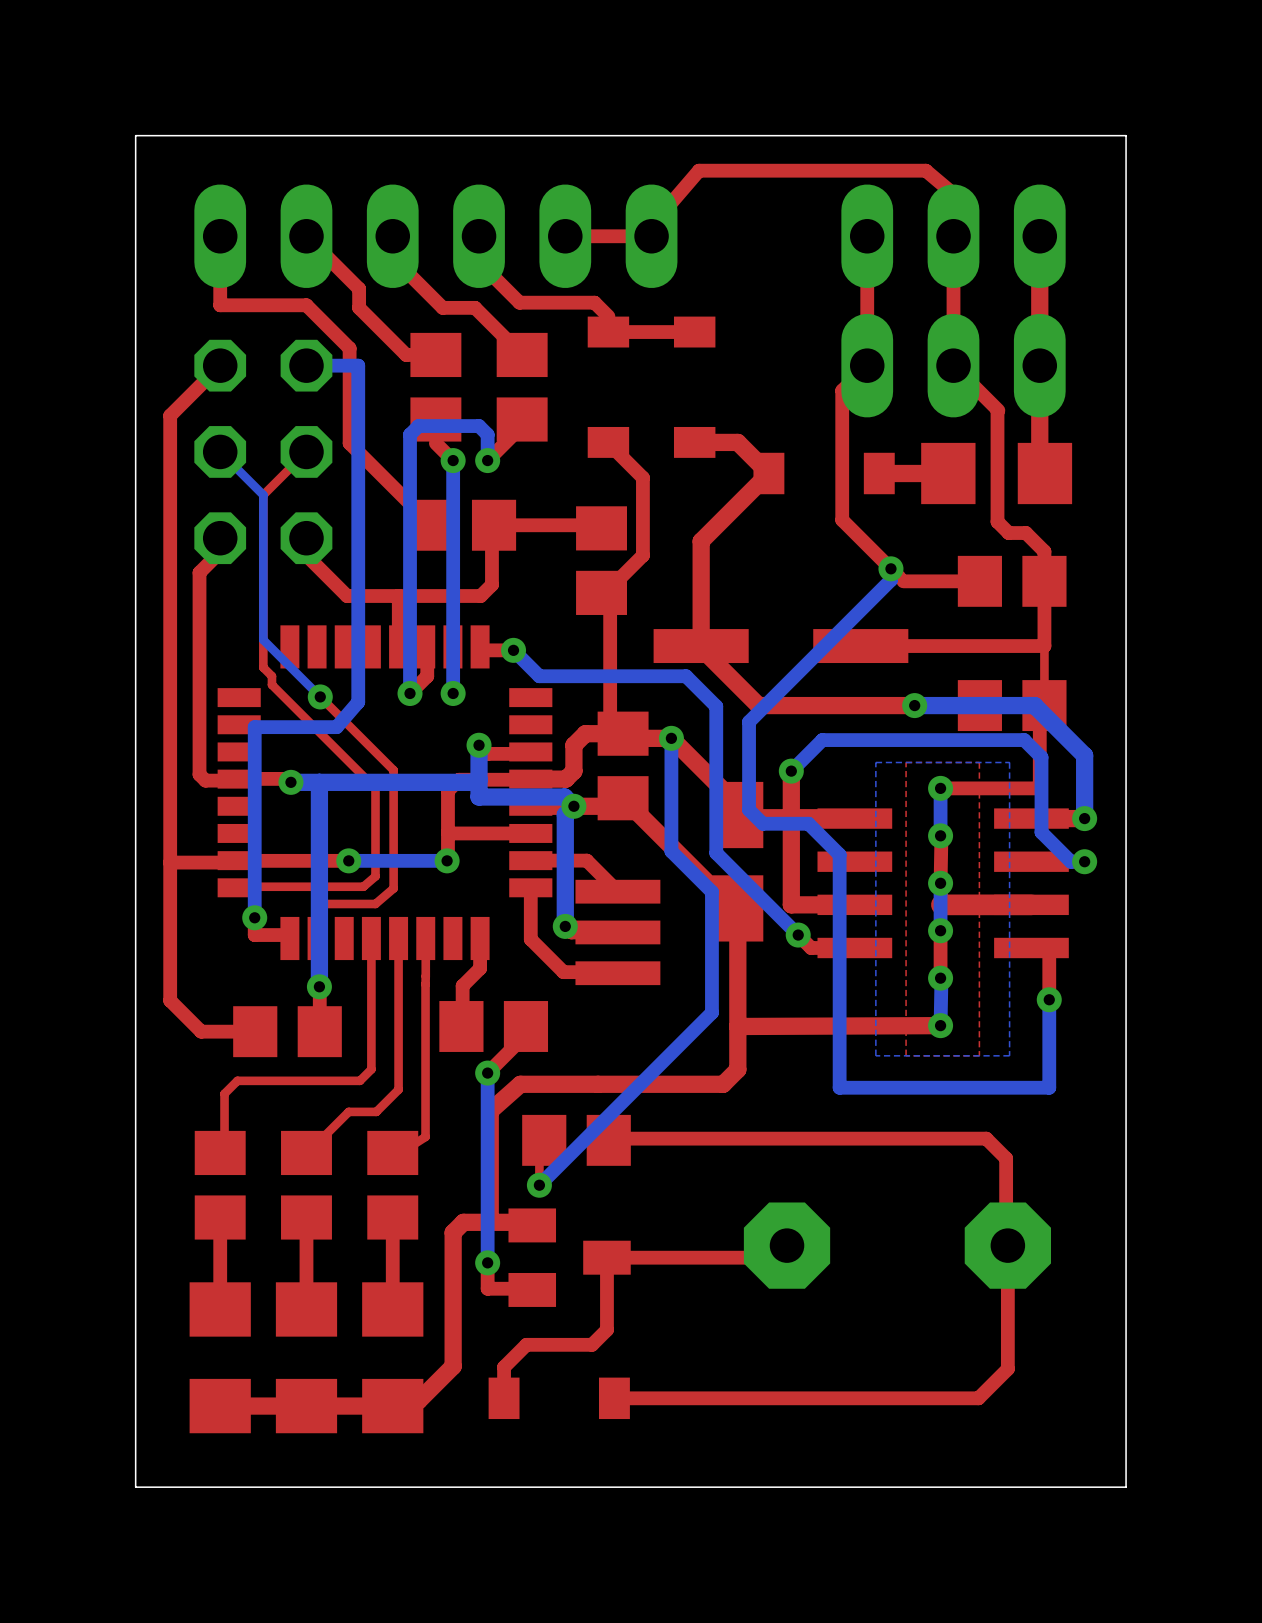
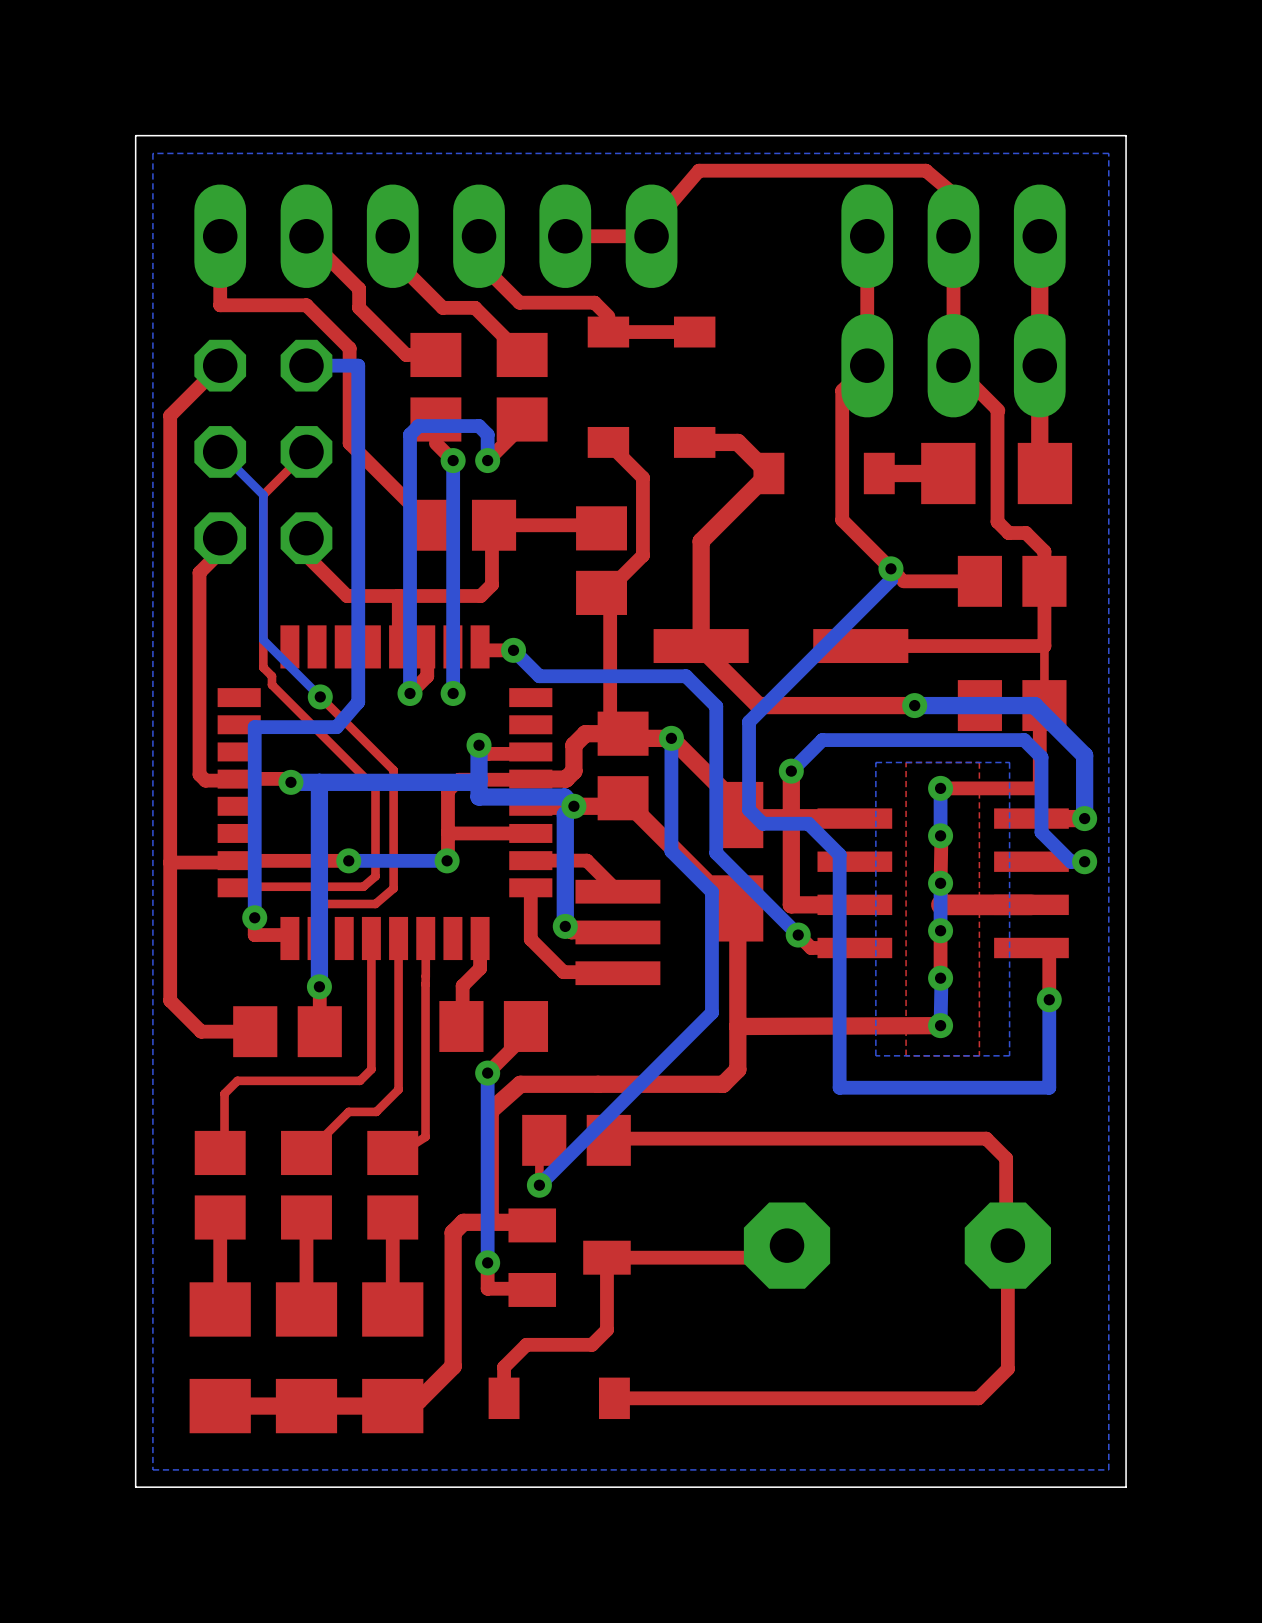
bottom zone outline: none -> (1108, 153) (152, 153) (152, 1469) (1108, 1469) (1108, 153)

